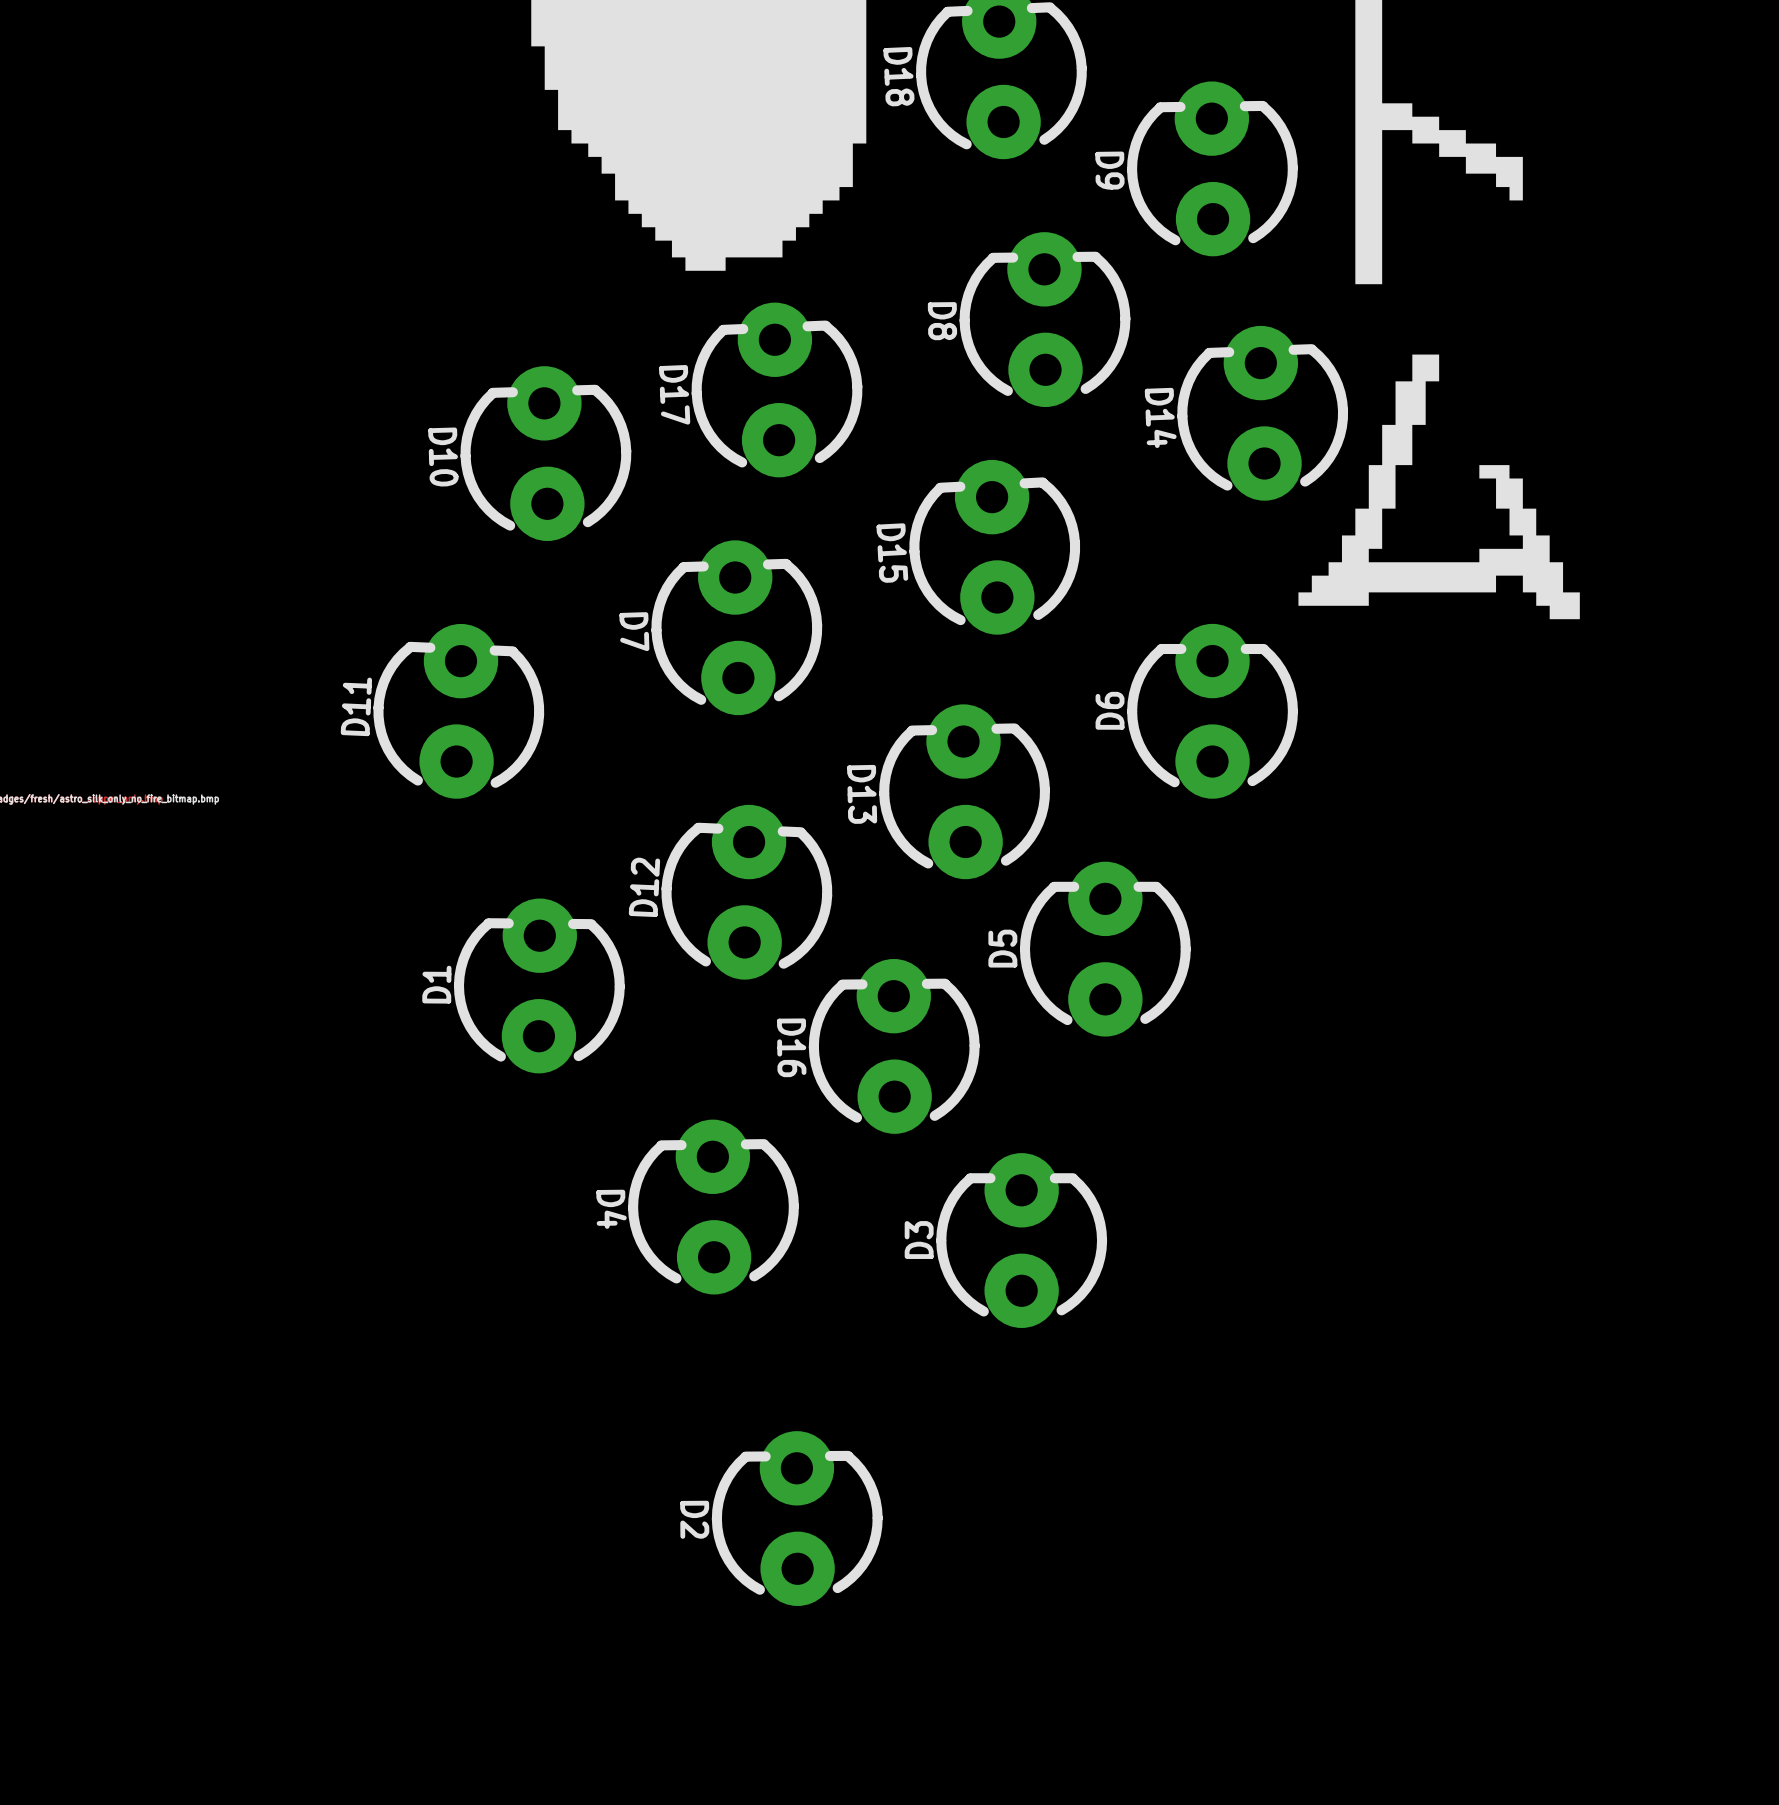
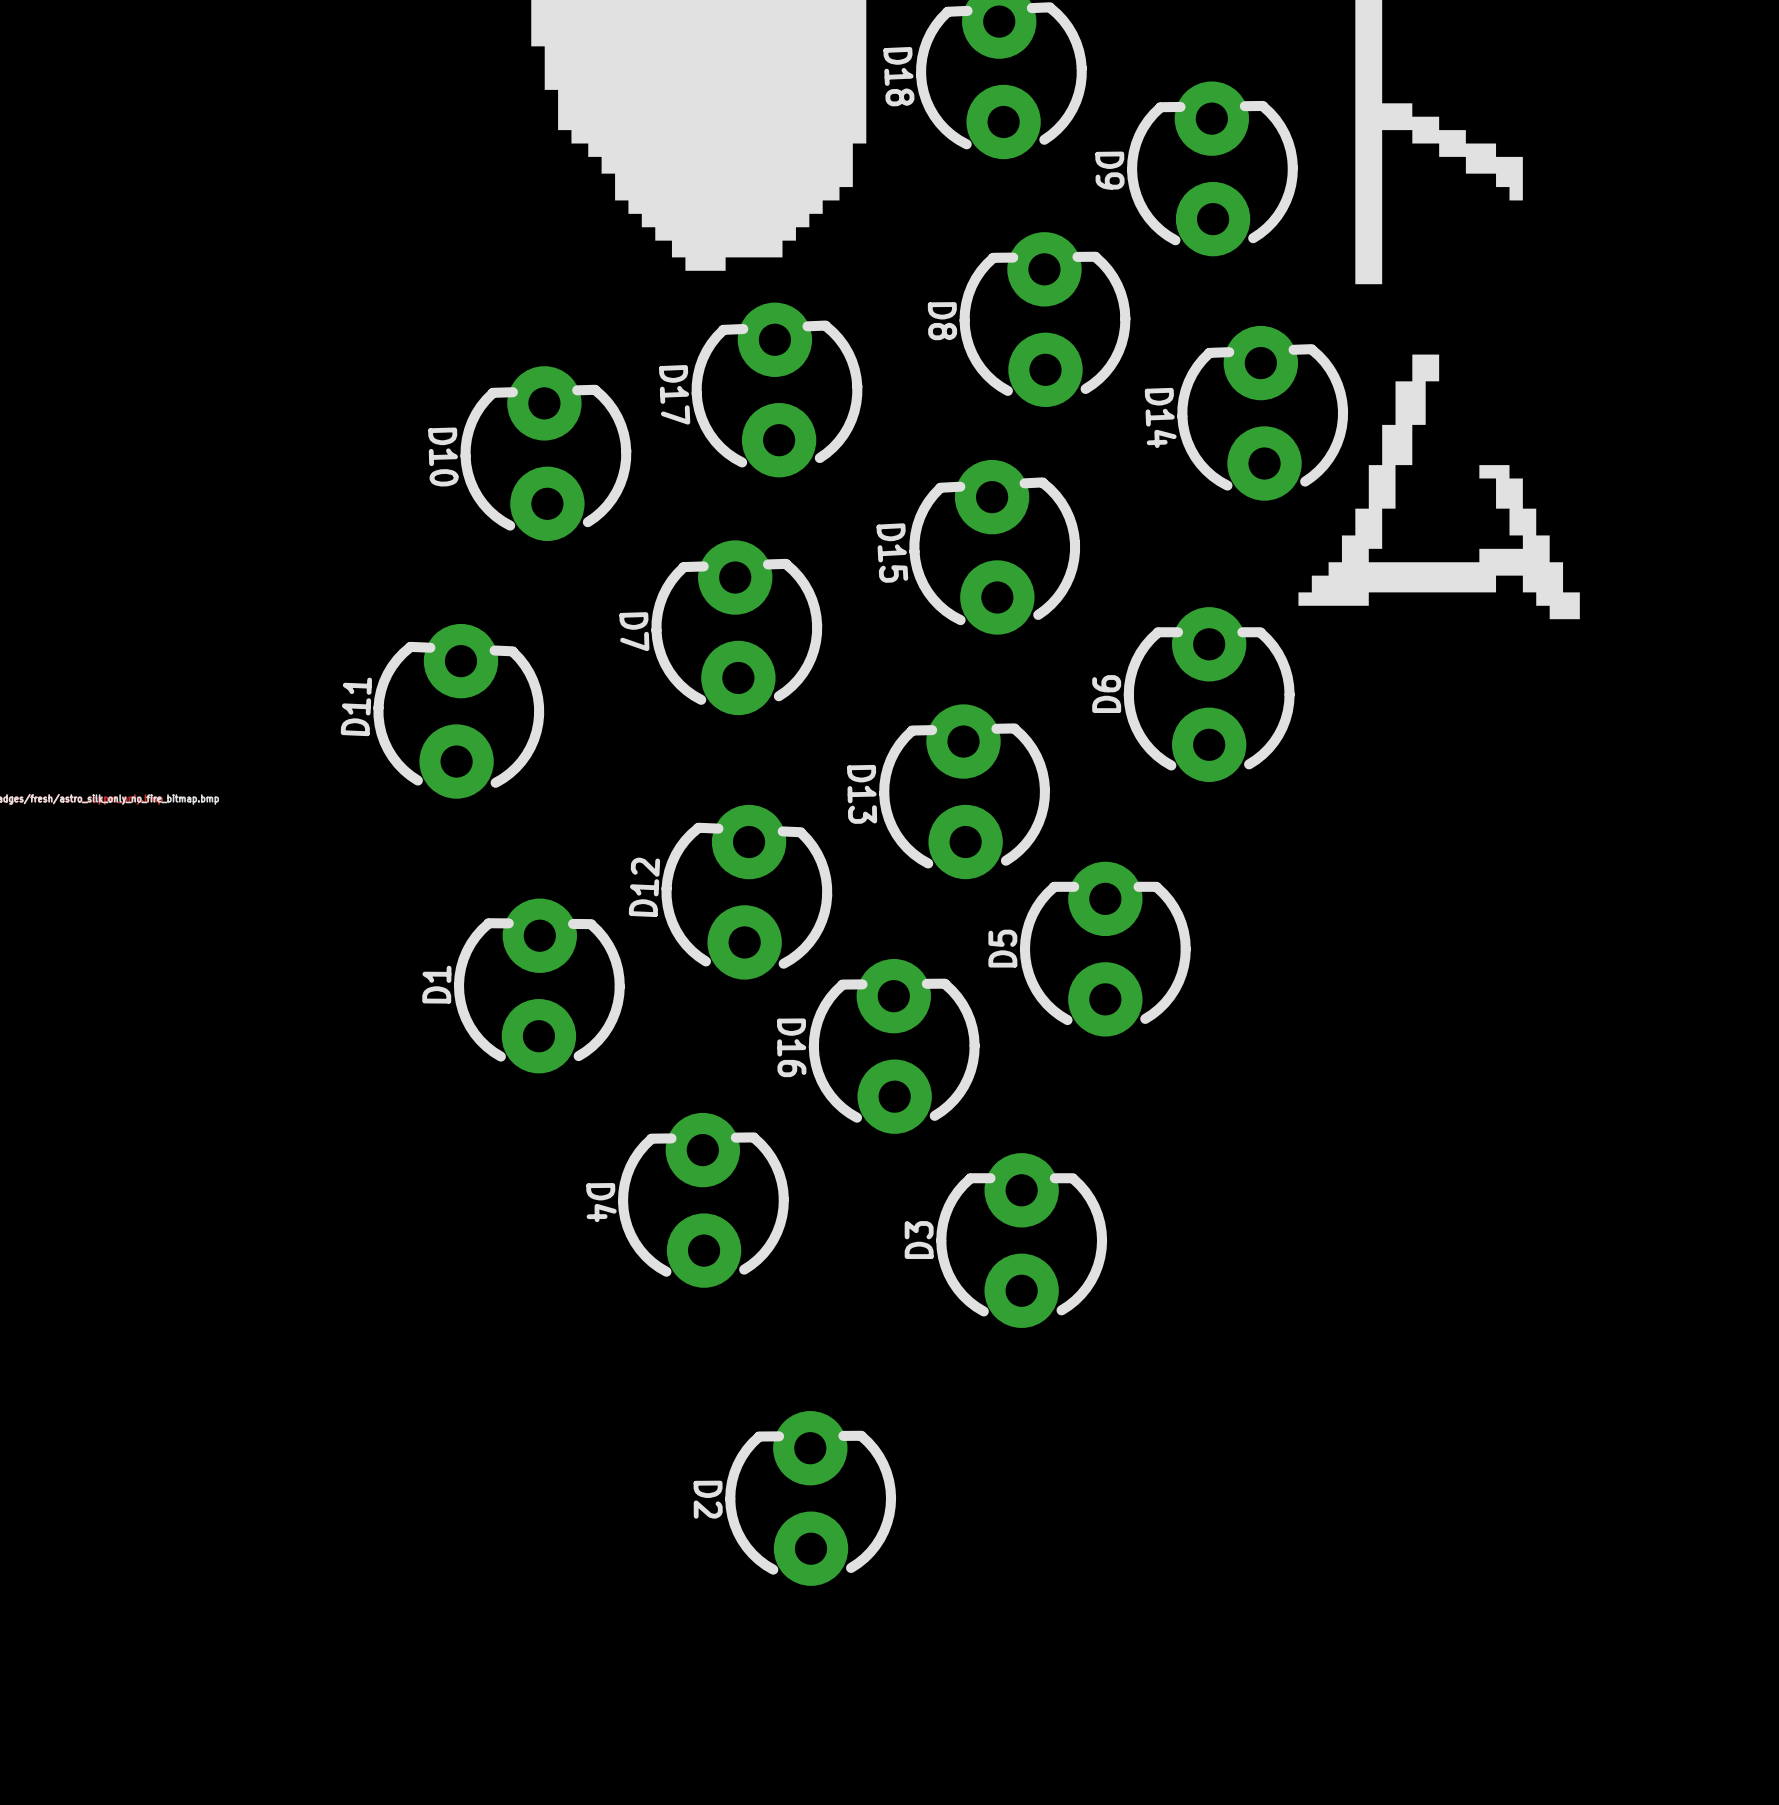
D6 position: (1212, 711) -> (1209, 694)
D4 position: (713, 1207) -> (703, 1200)
D2 position: (797, 1518) -> (810, 1498)

